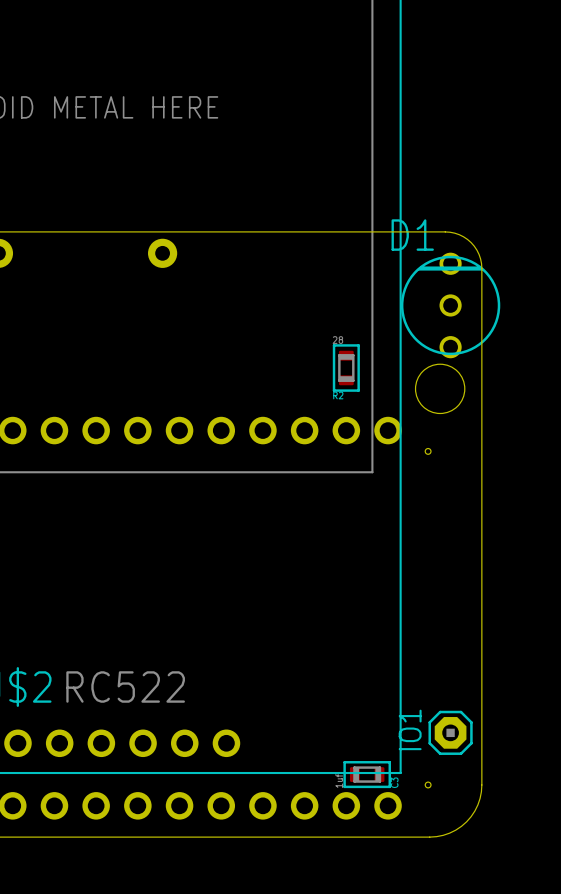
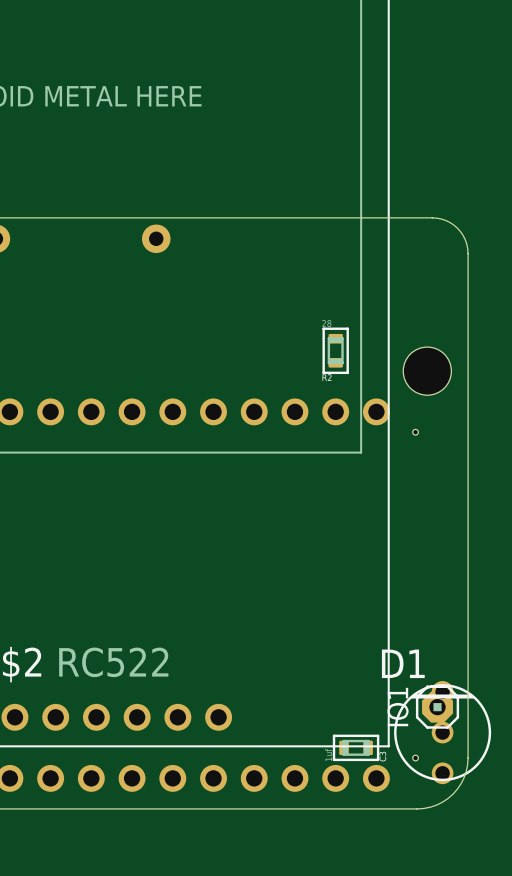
D1 position: (450, 305) -> (442, 732)

